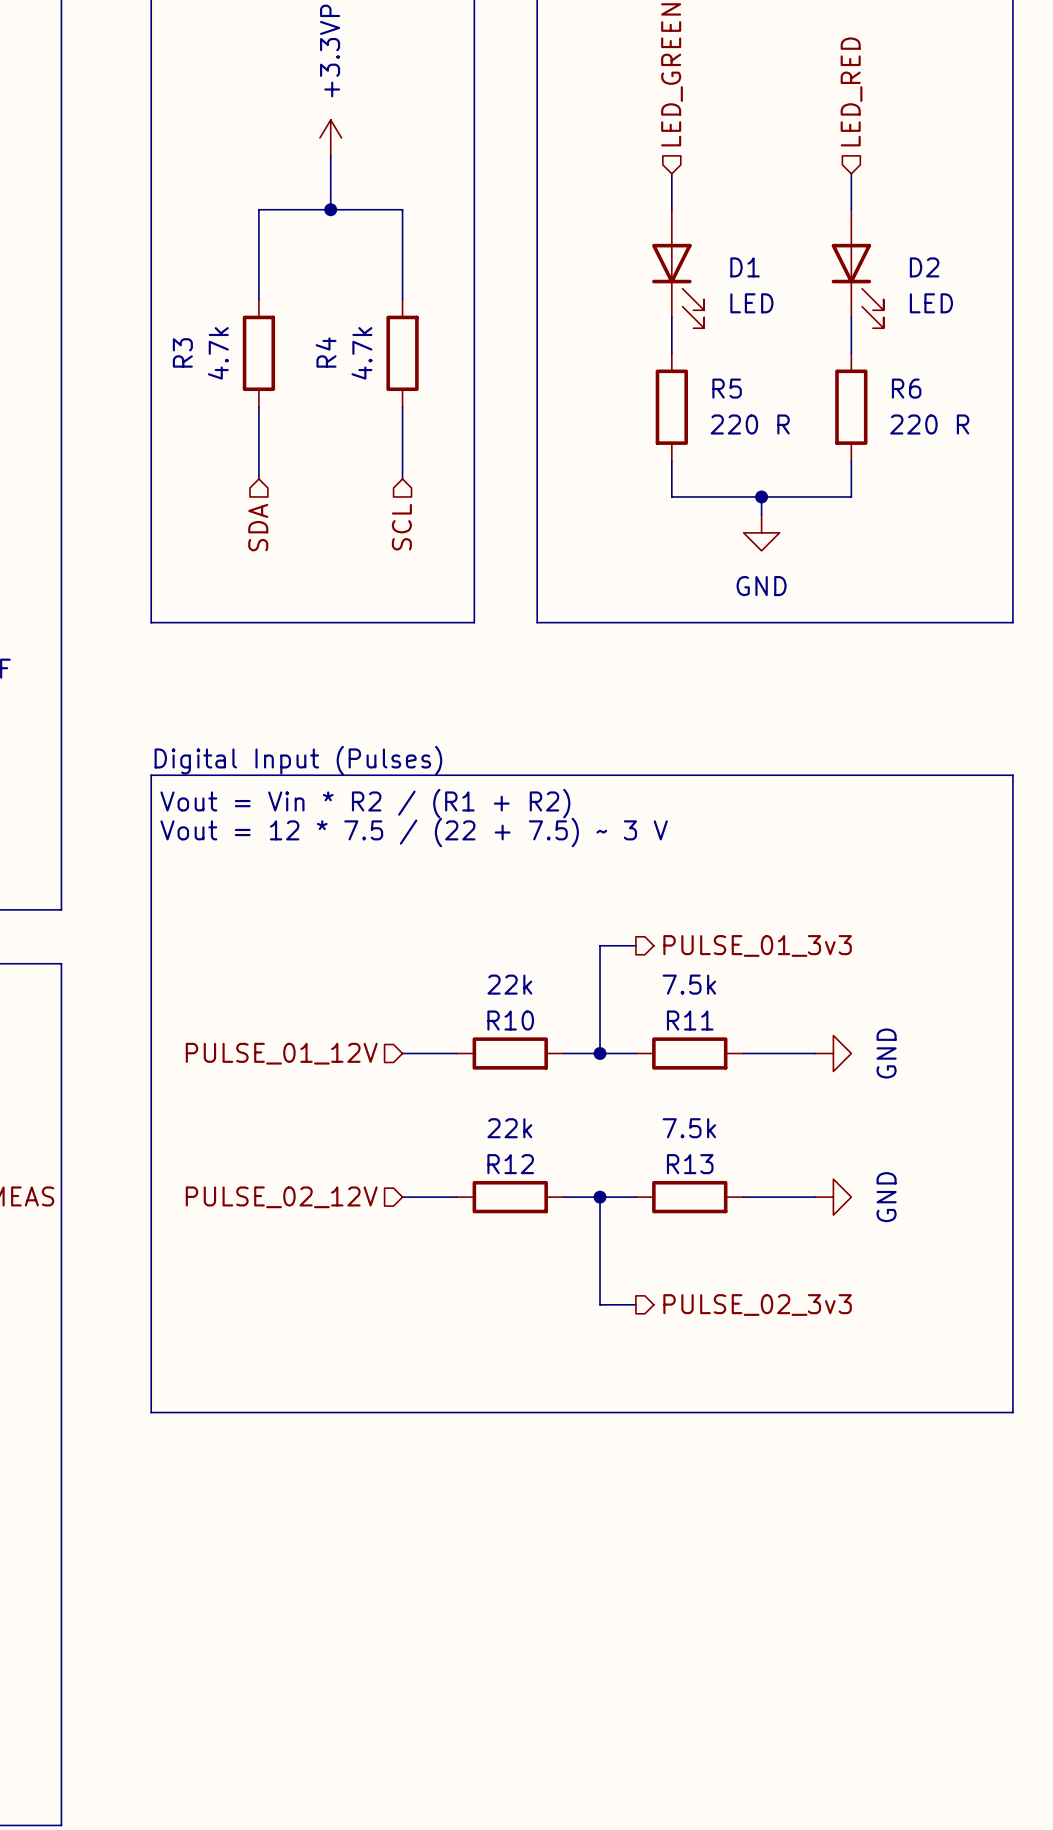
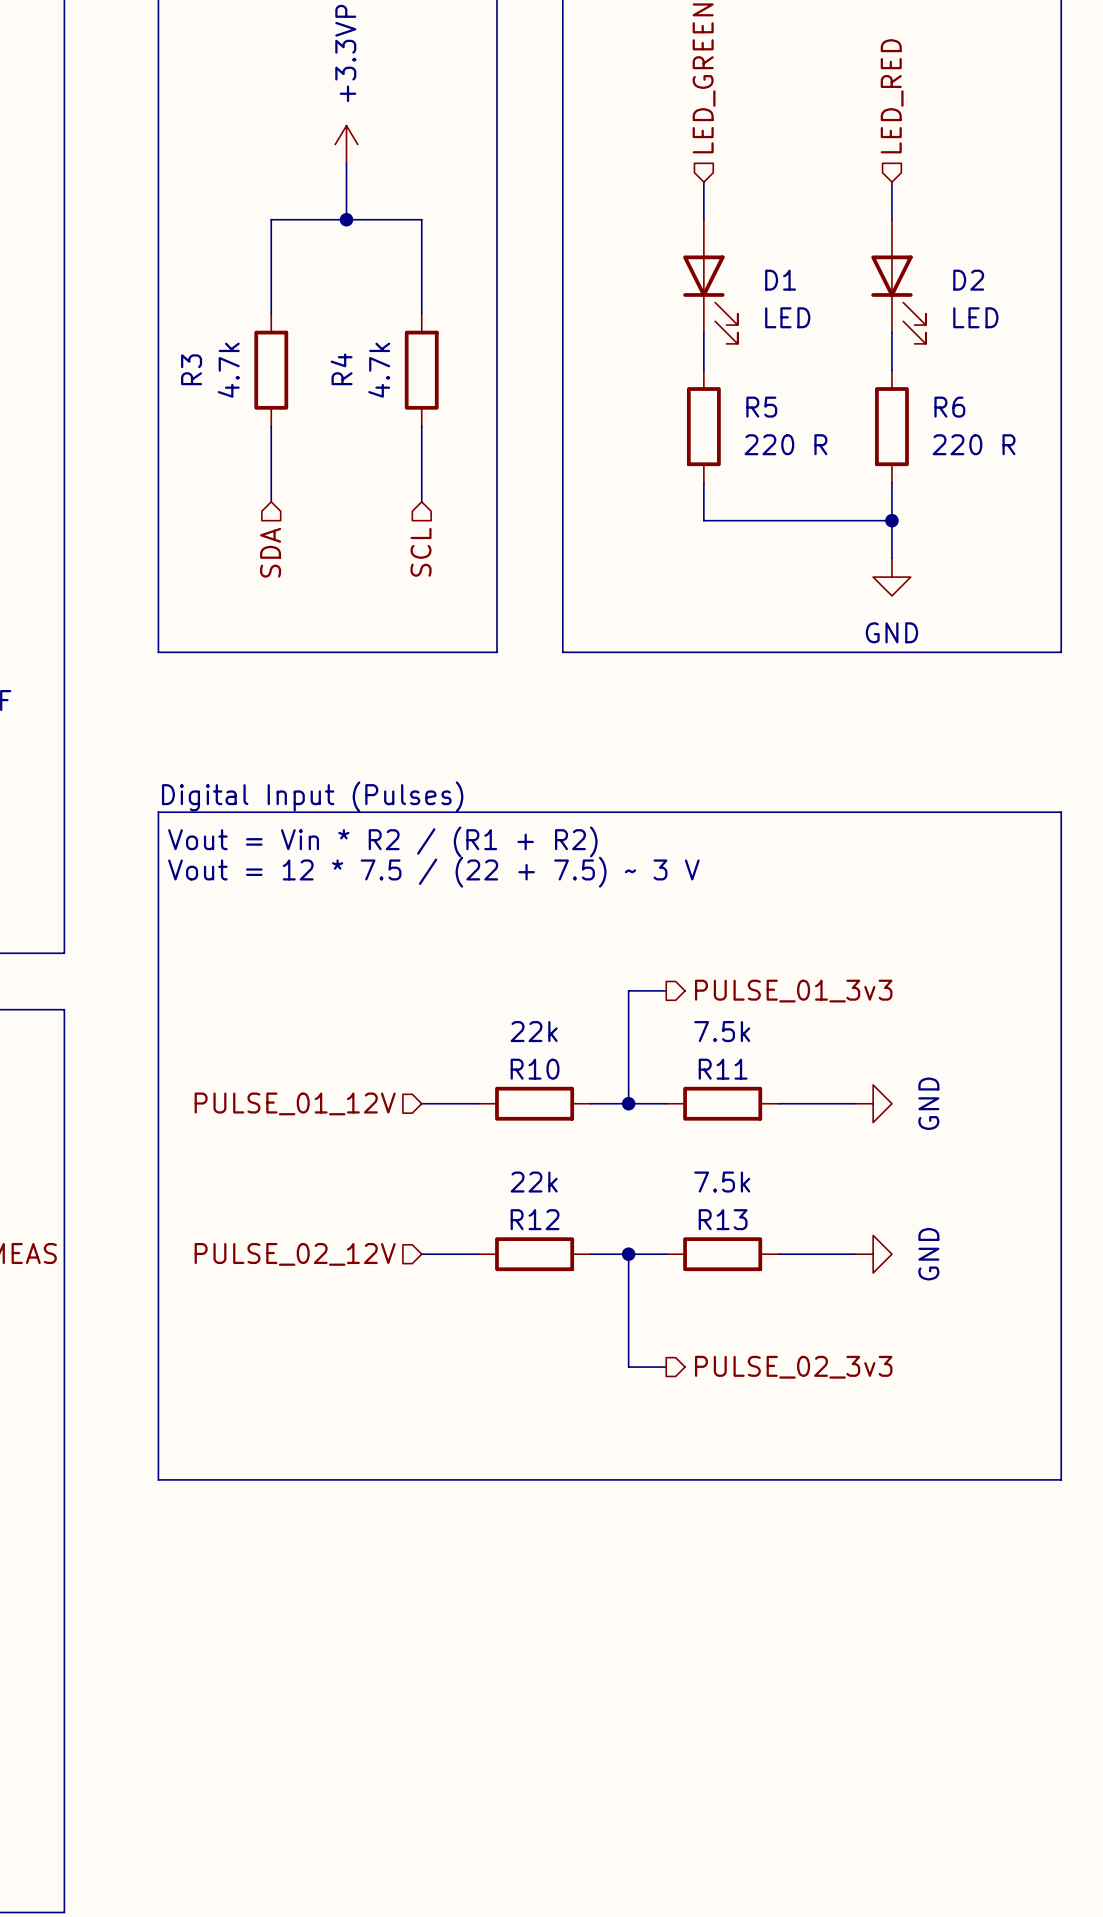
wire: (761, 496) (761, 514) -> none
junction: (761, 496) -> none
wire: none -> (891, 520) (891, 558)
junction: none -> (891, 520)
power symbol position: GND (761, 532) -> GND (891, 577)

